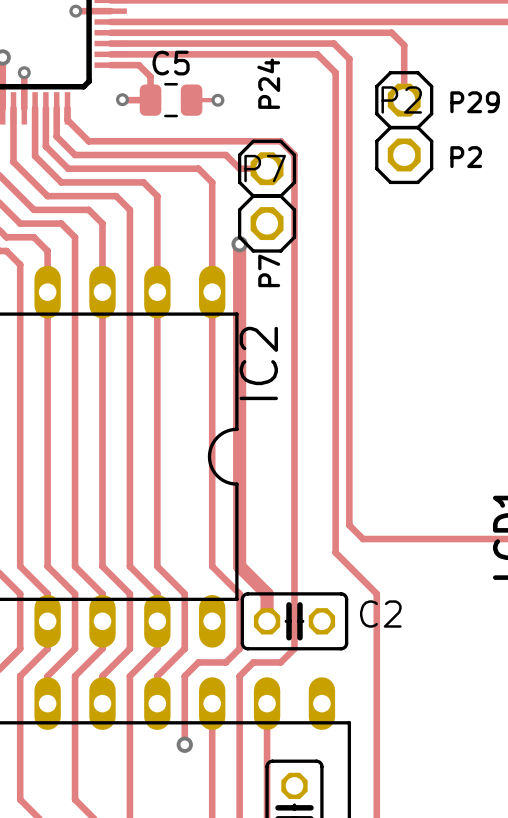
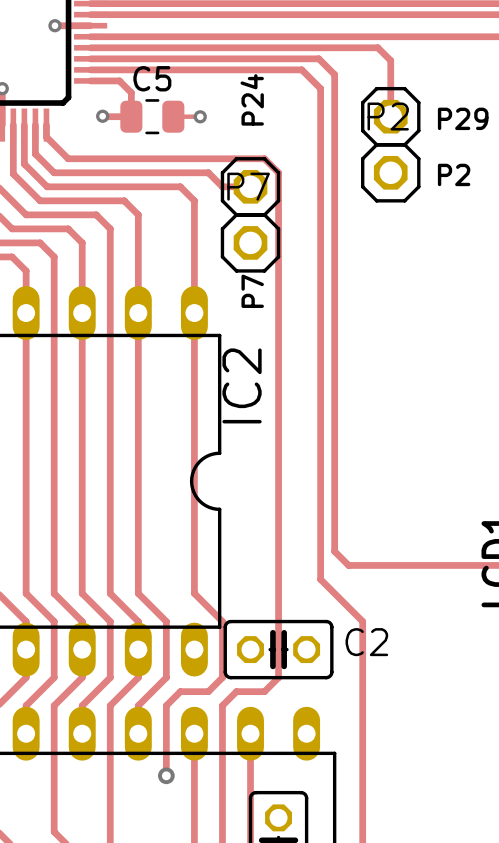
track: (239, 244) (239, 566) (267, 593) (267, 621) -> none
via: (239, 244) -> none

